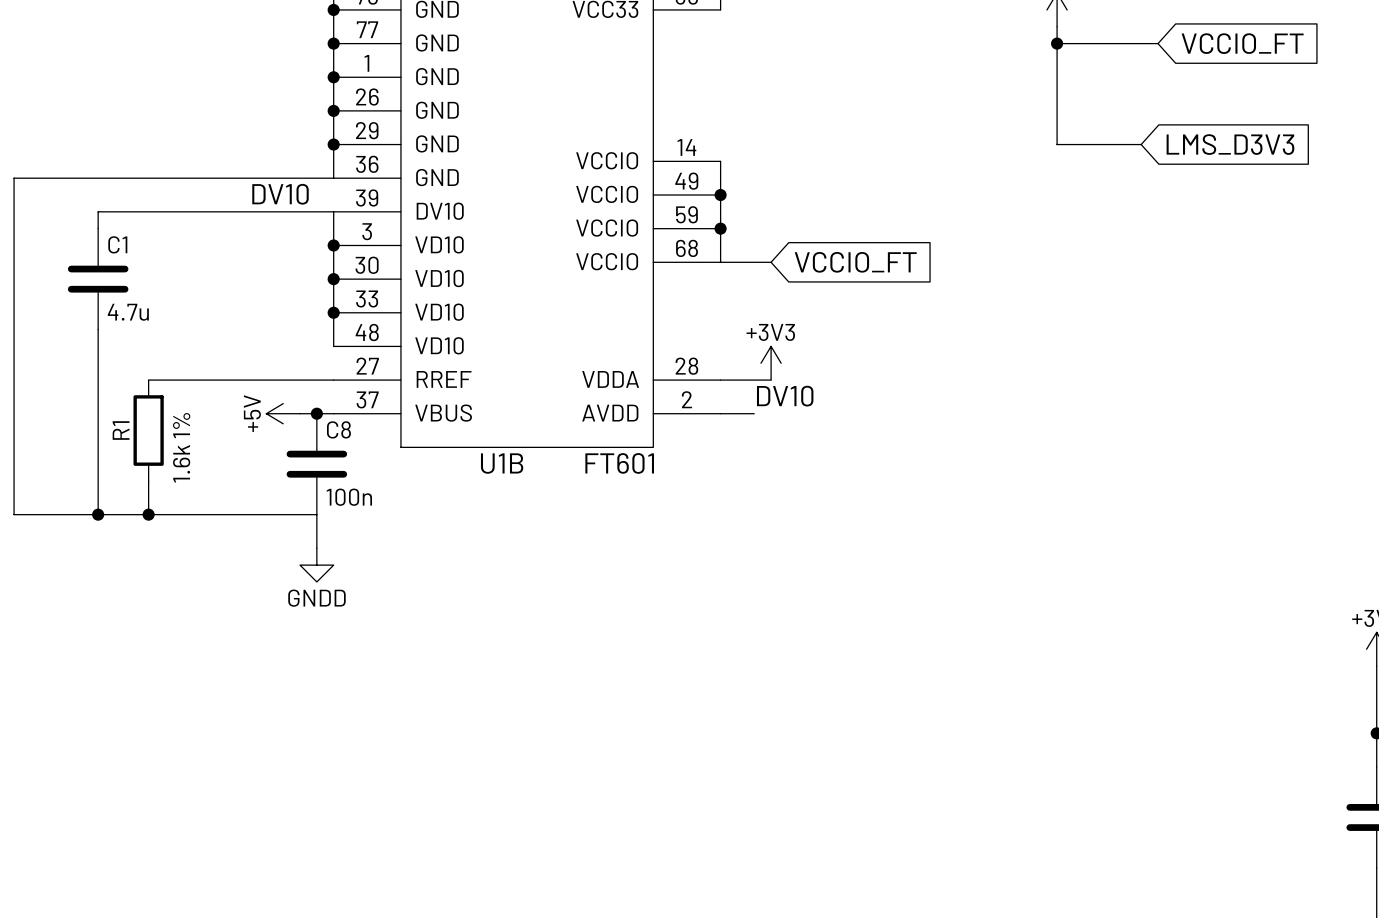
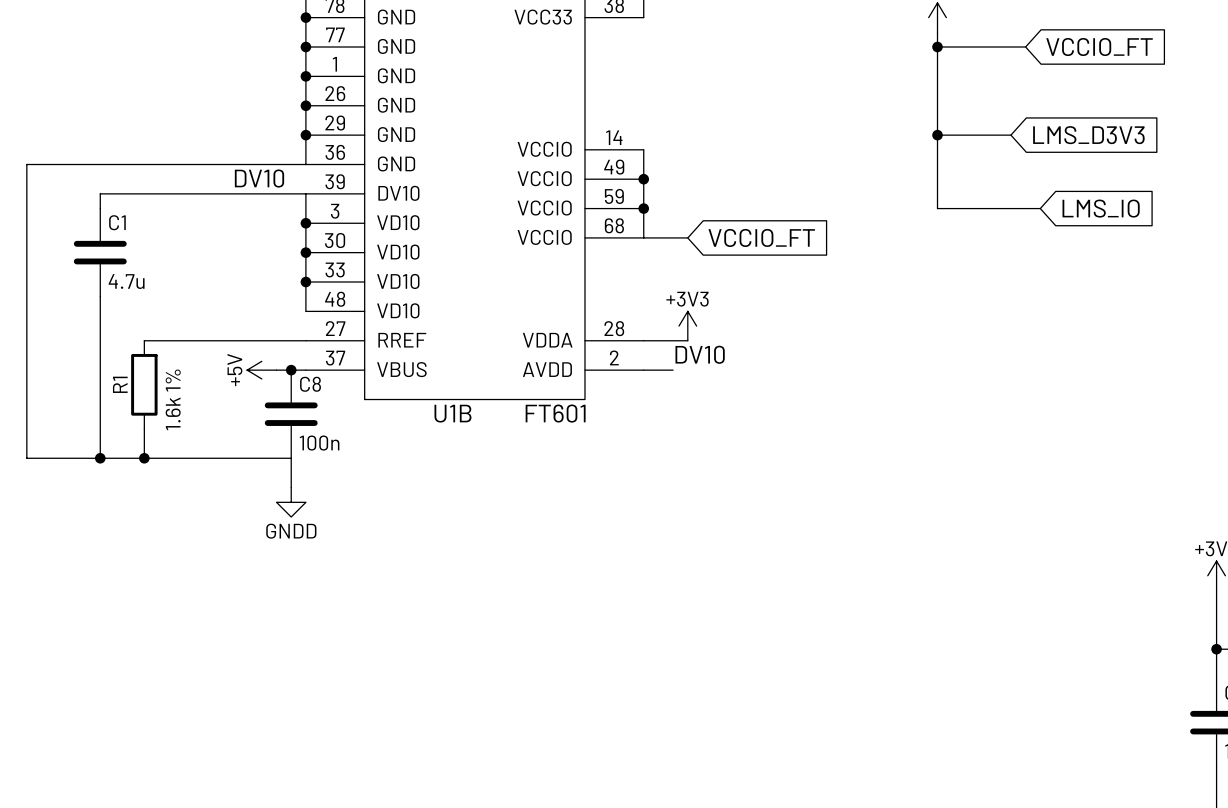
wire: none -> (937, 135) (937, 208) (1040, 208)
junction: none -> (937, 135)
global label: none -> LMS_IO (1101, 208)

